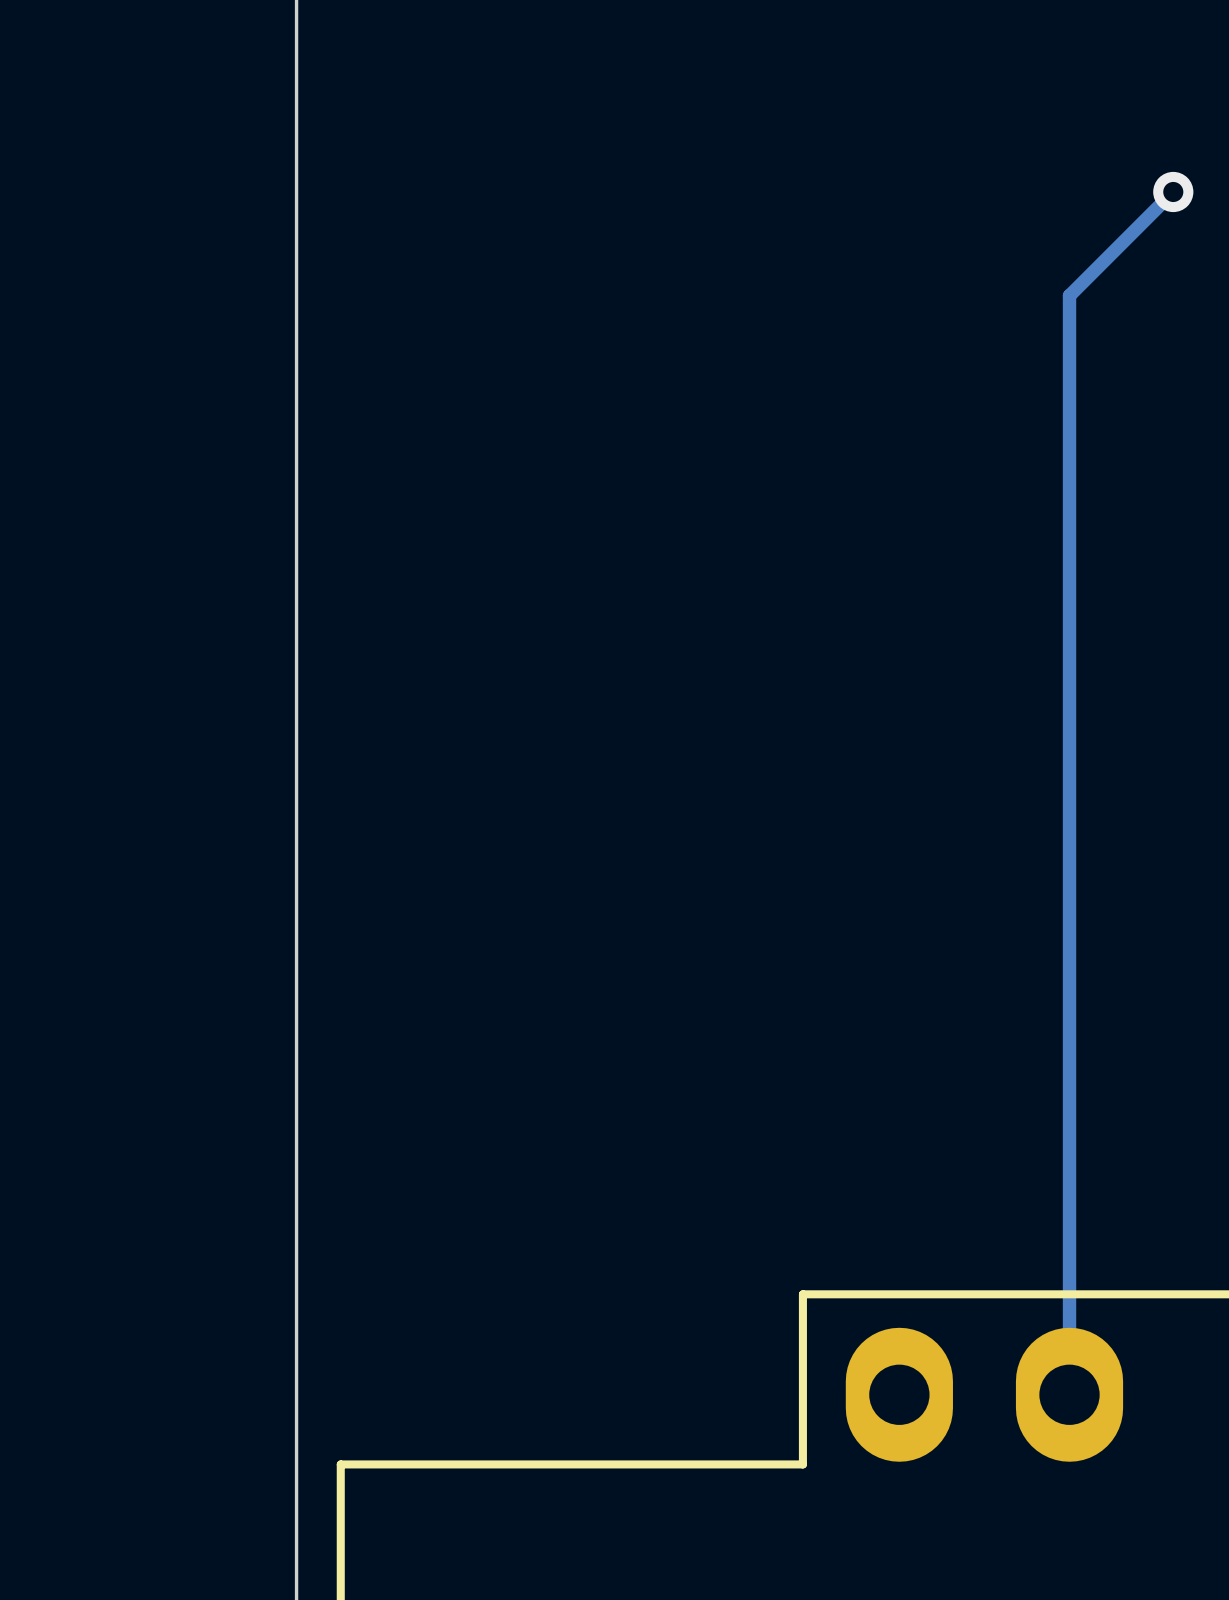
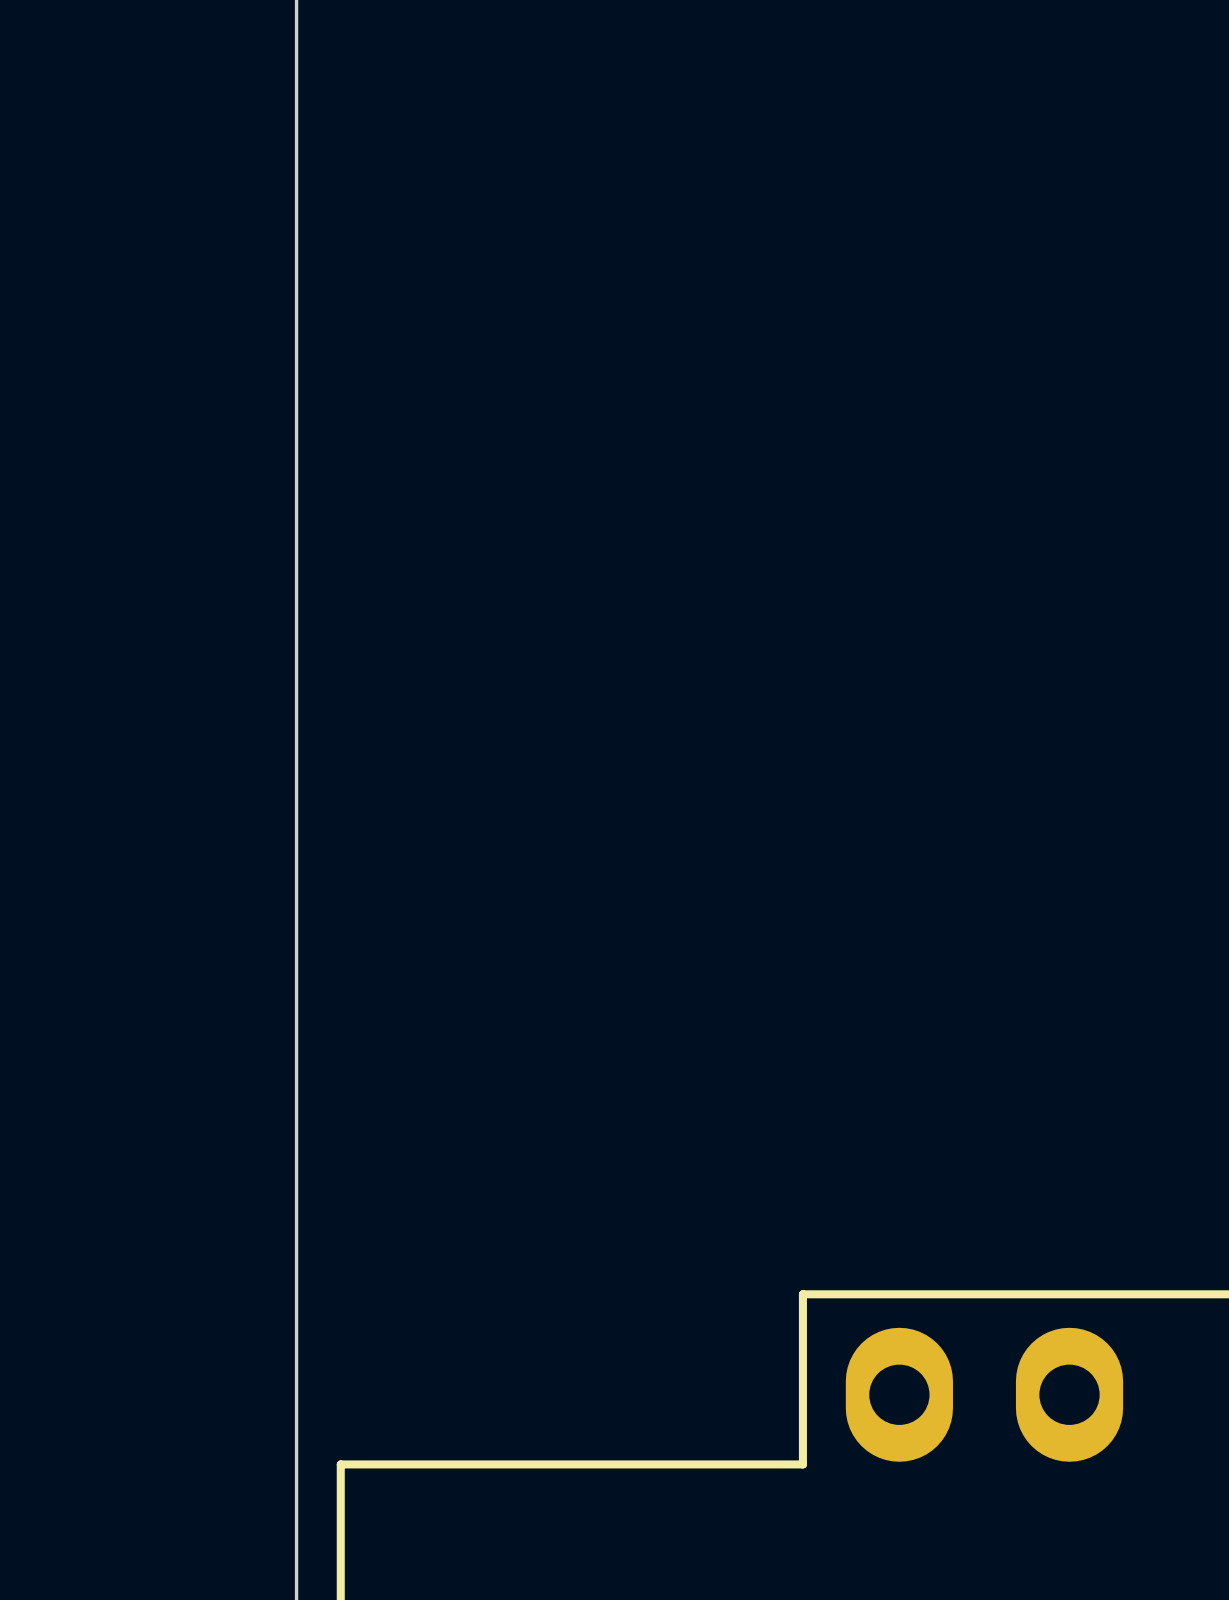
track: (1173, 191) (1069, 295) (1069, 1394) -> none
via: (1173, 191) -> none

